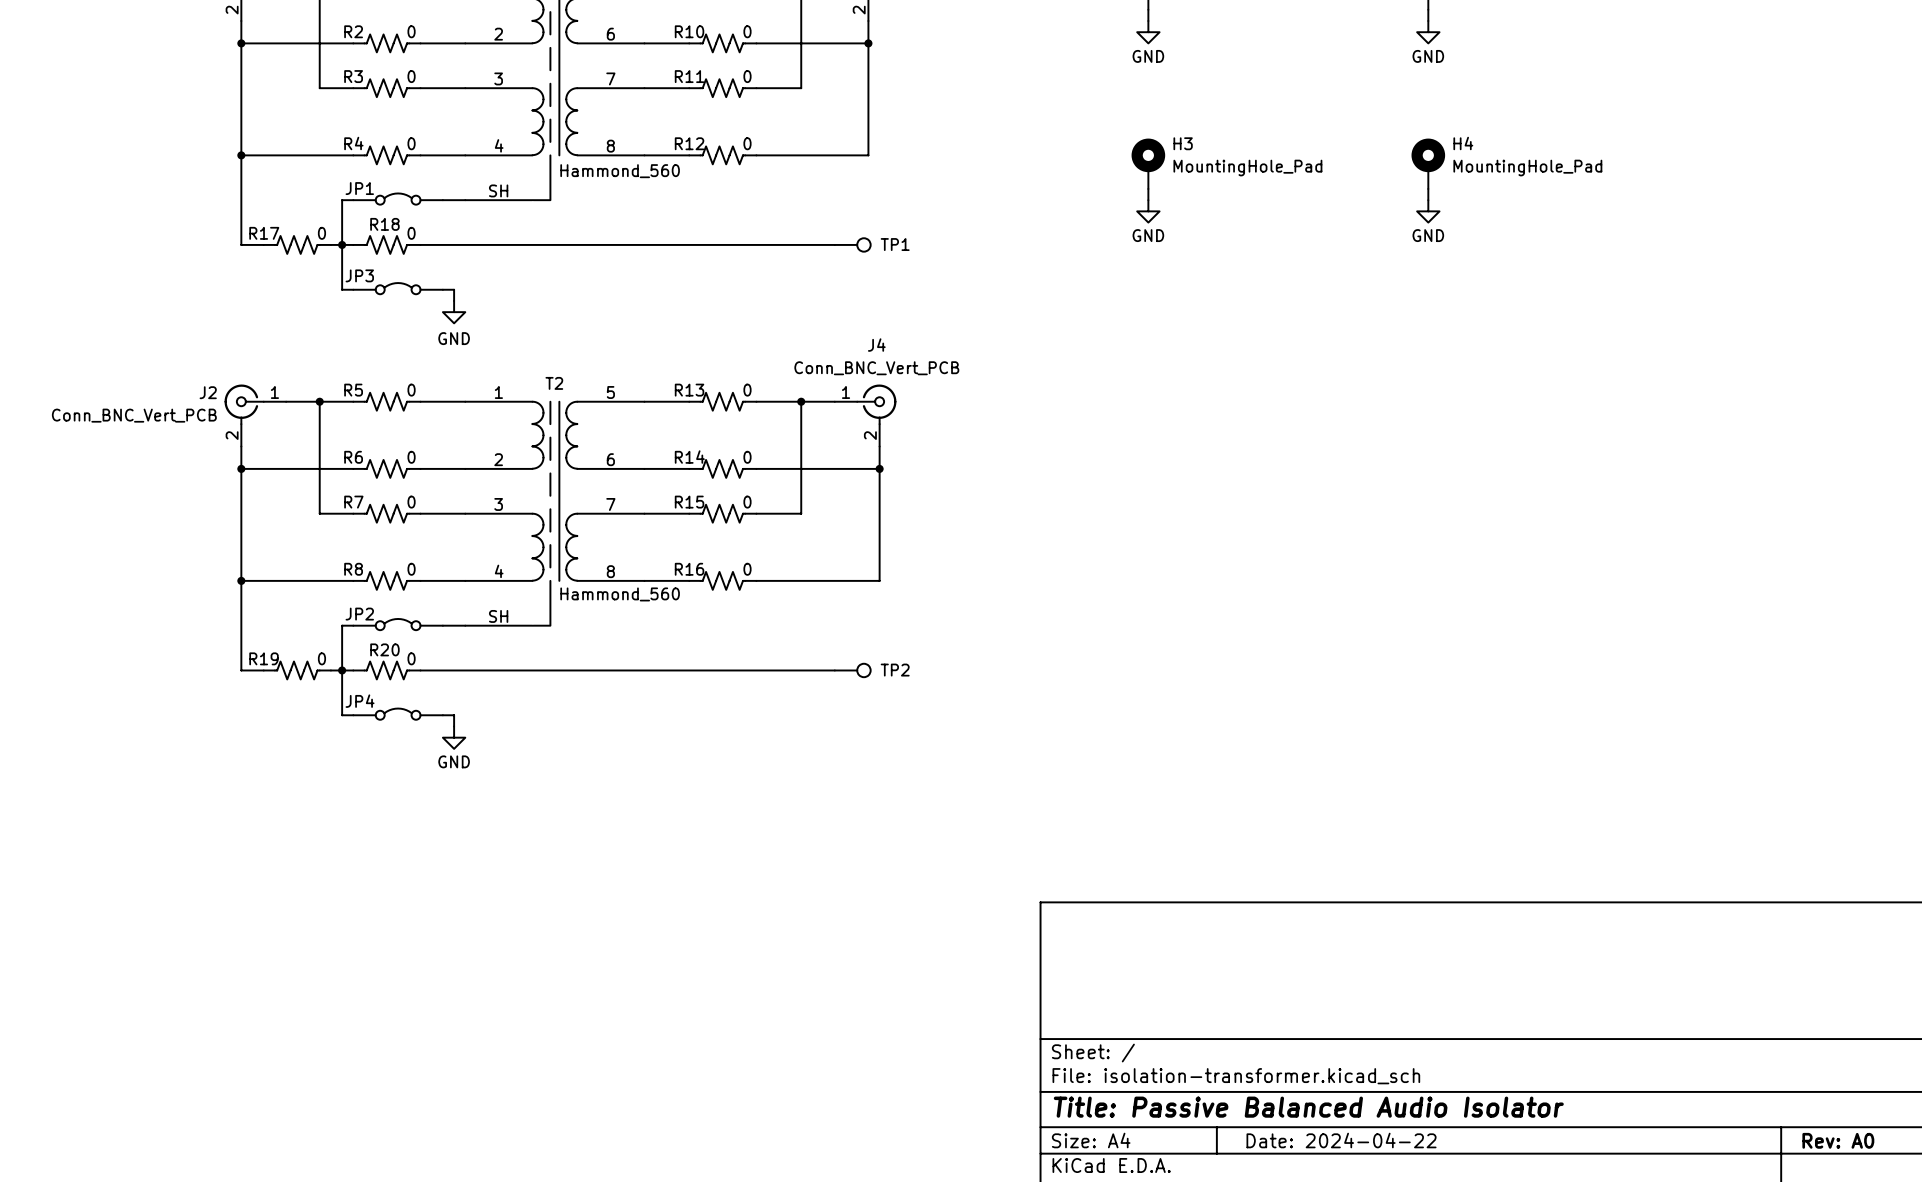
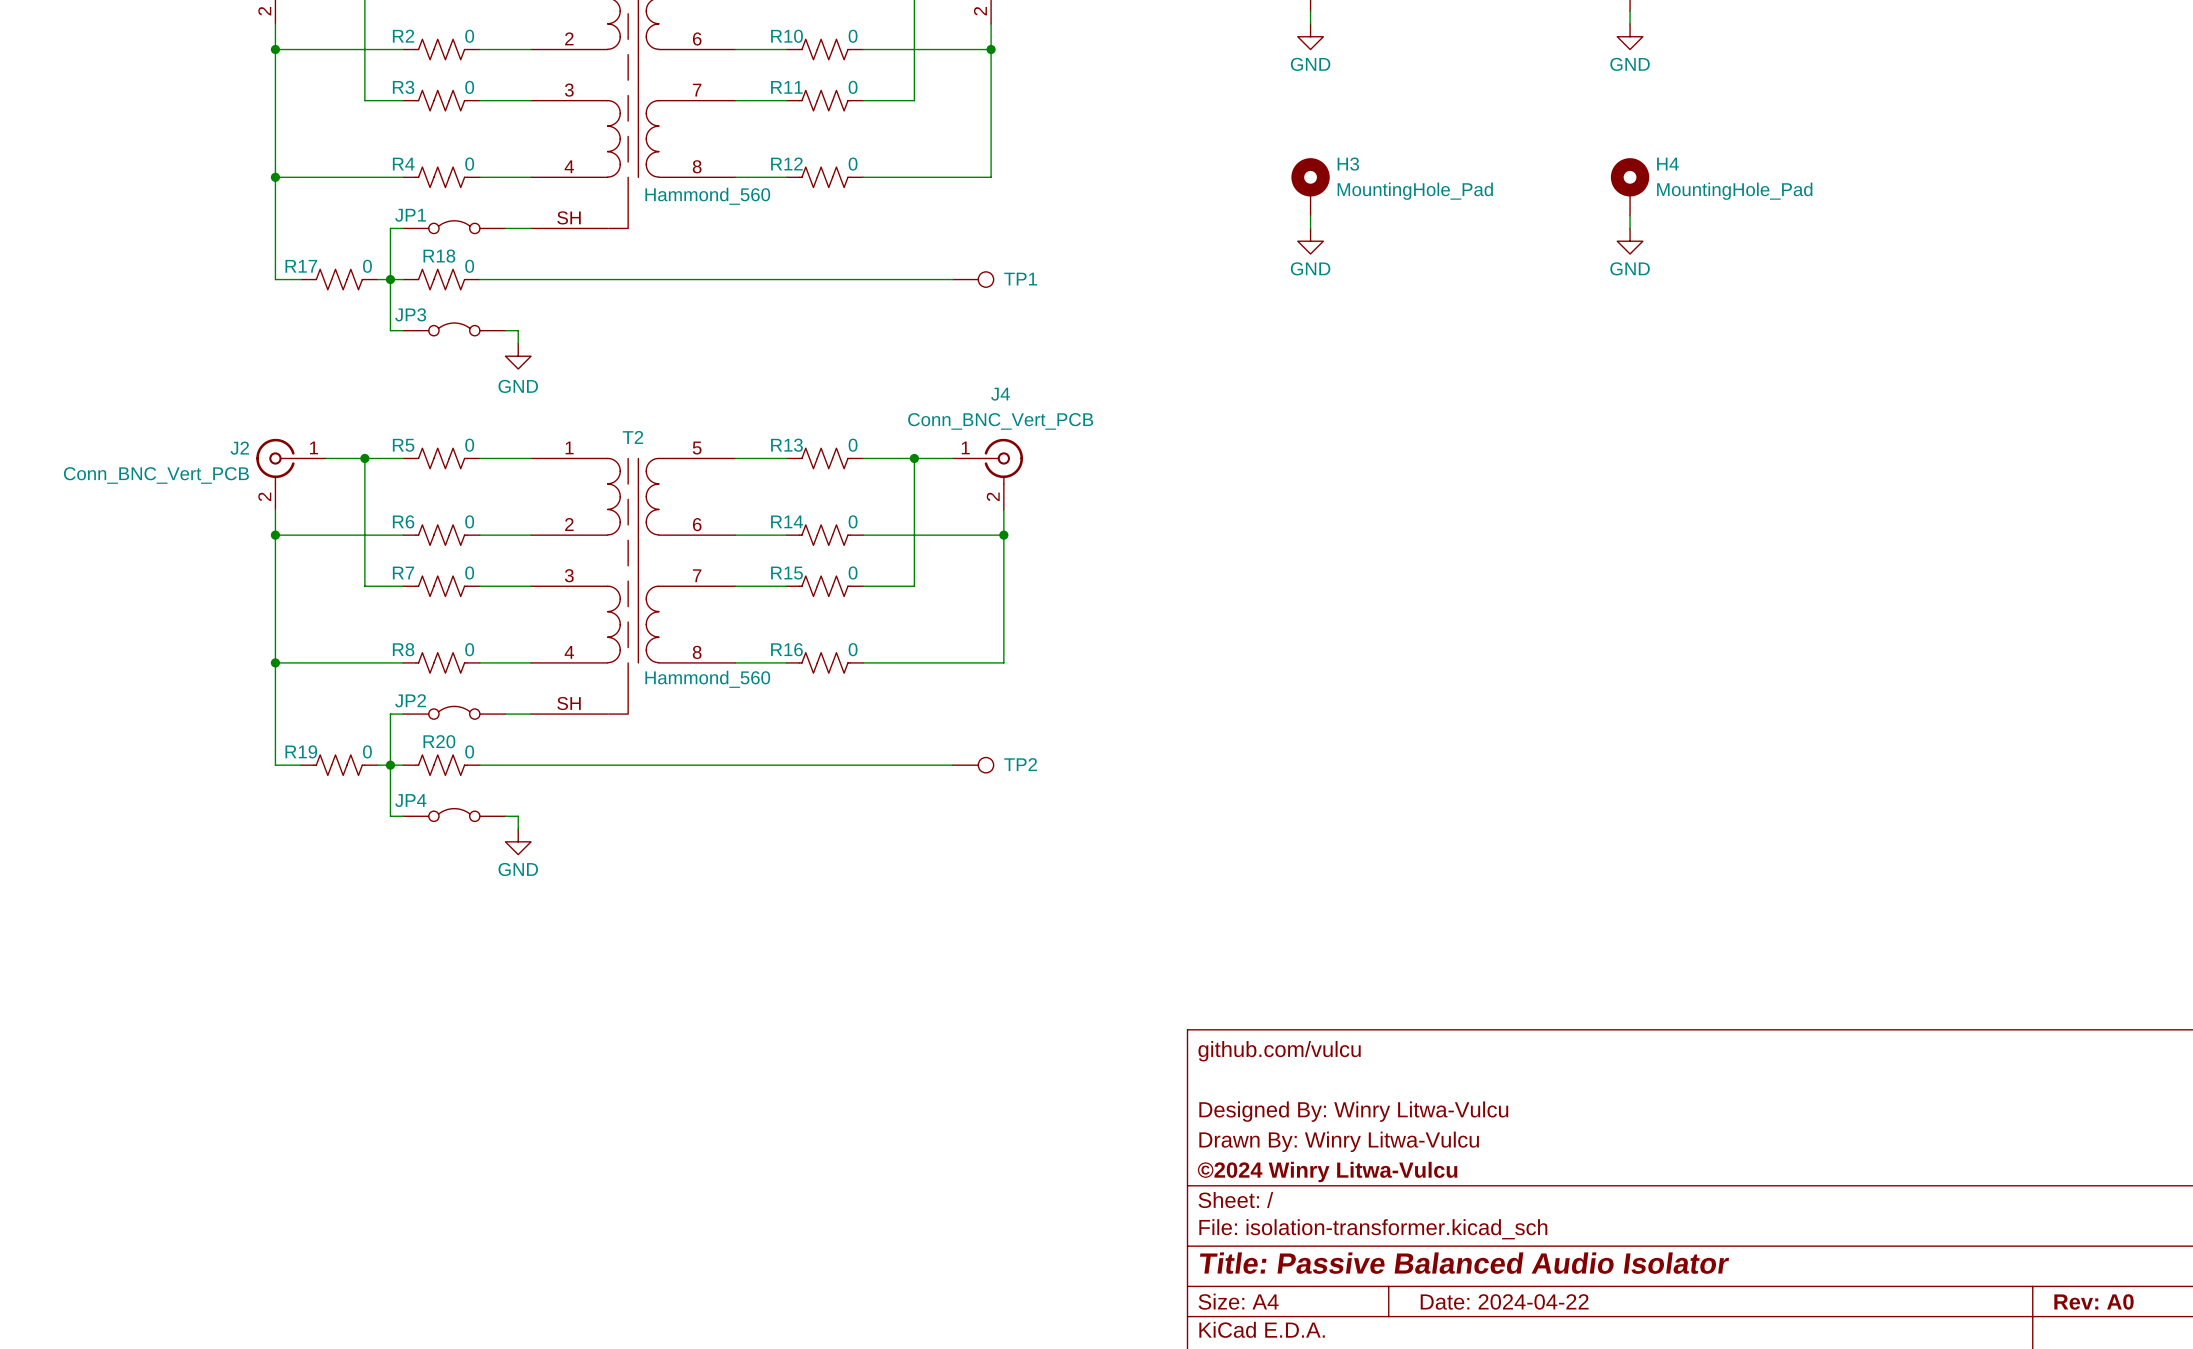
title block: none -> github.com/vulcu (1279, 1051)
title block: none -> Designed By: Winry Litwa-Vulcu (1353, 1111)
title block: none -> Drawn By: Winry Litwa-Vulcu (1339, 1141)
title block: none -> ©2024 Winry Litwa-Vulcu (1327, 1172)

